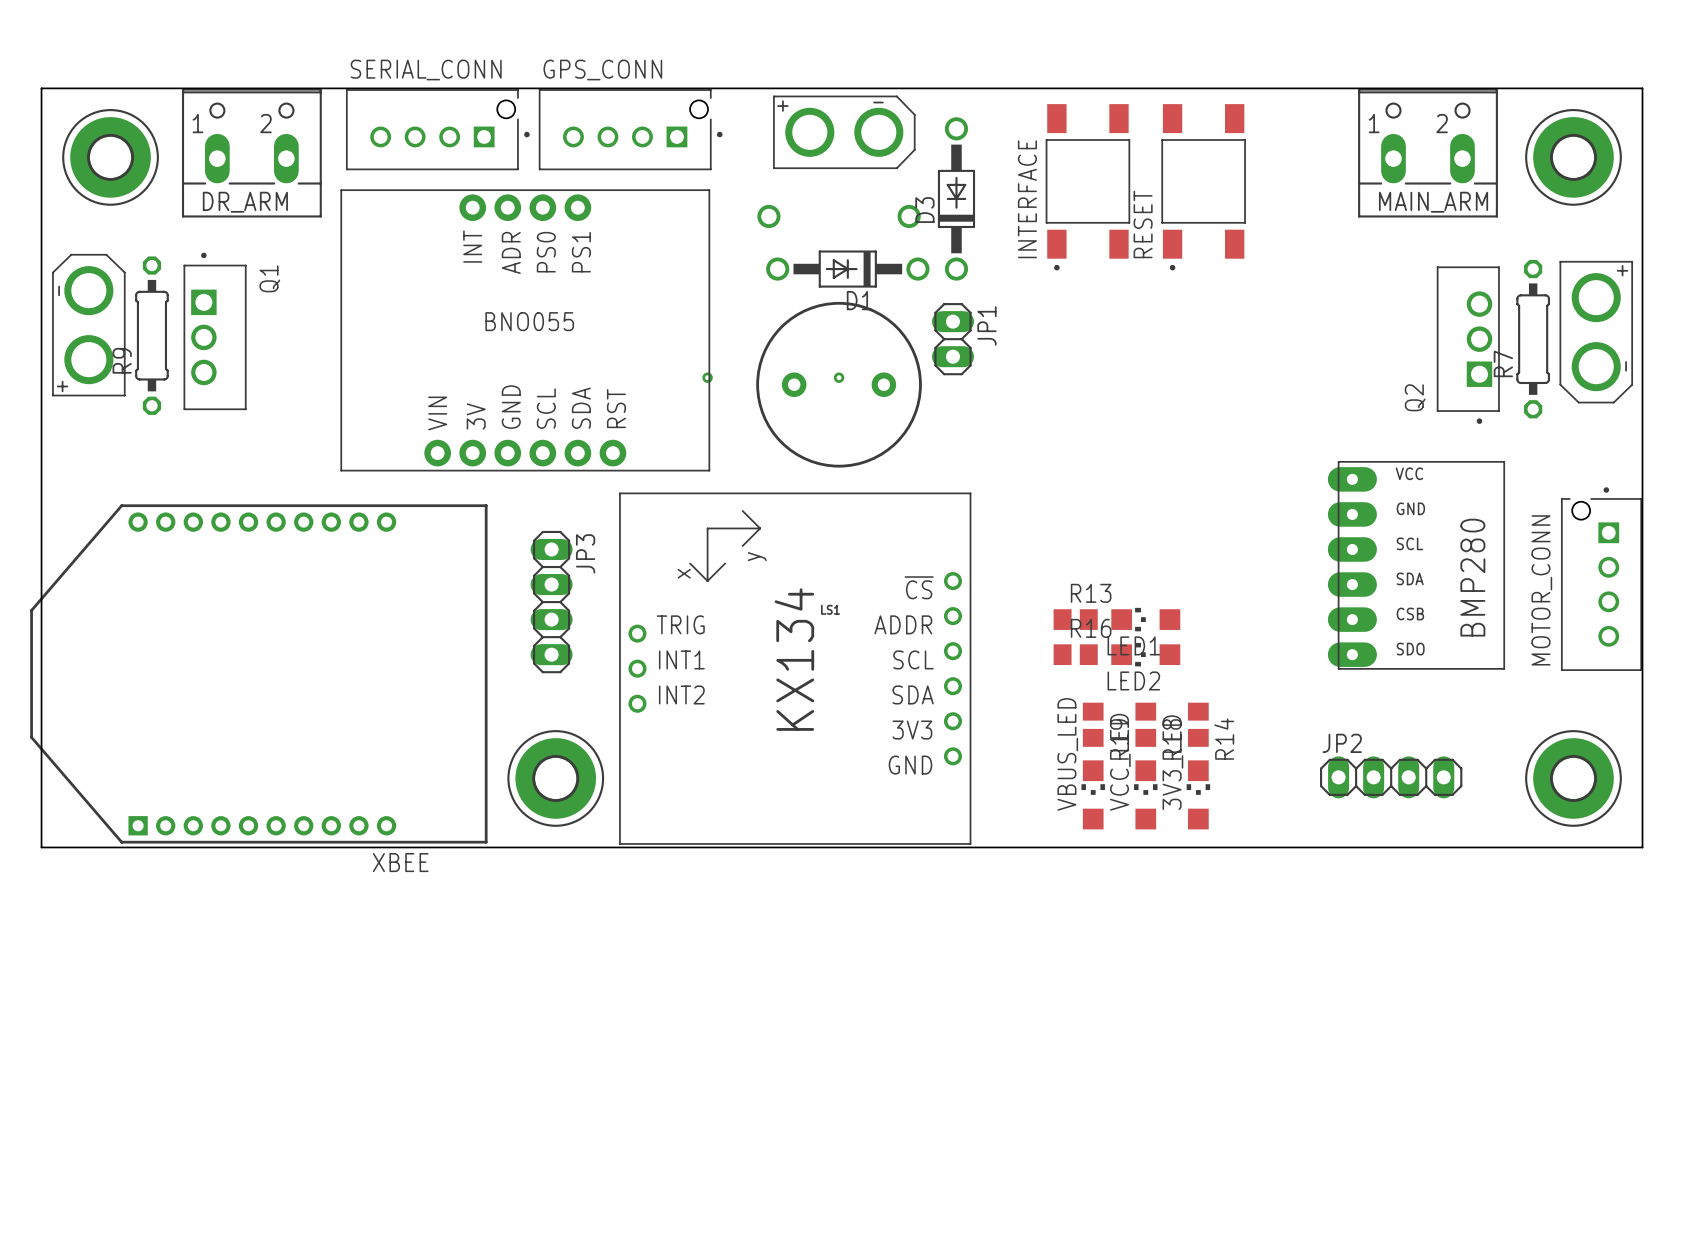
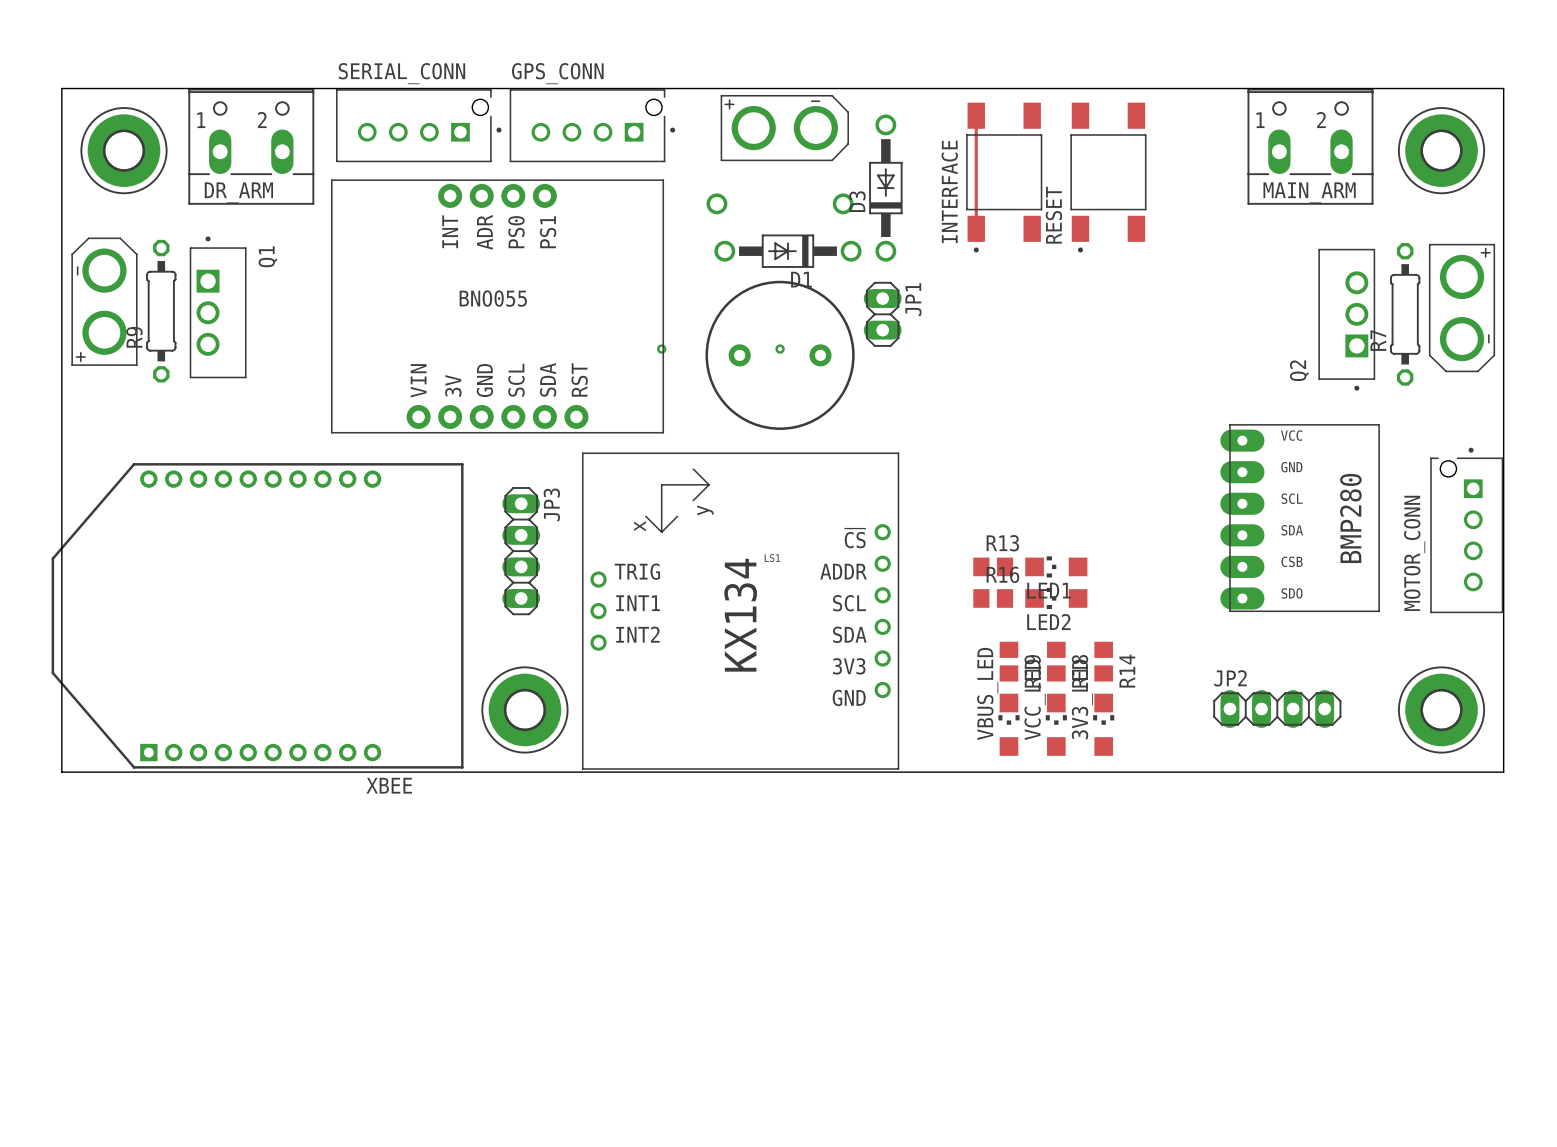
track: none -> (976, 115) (976, 228)

